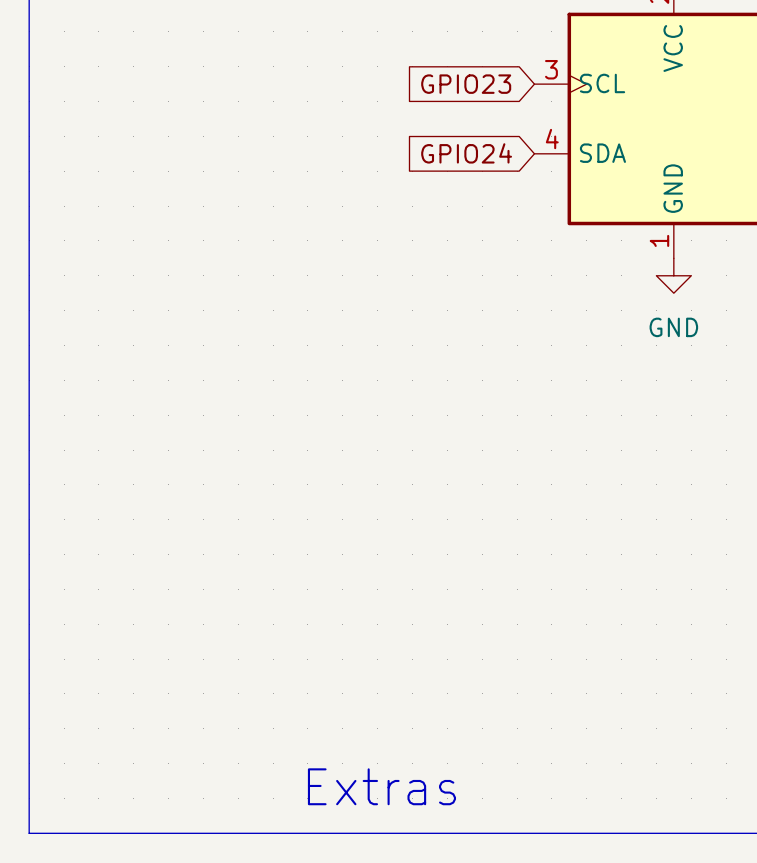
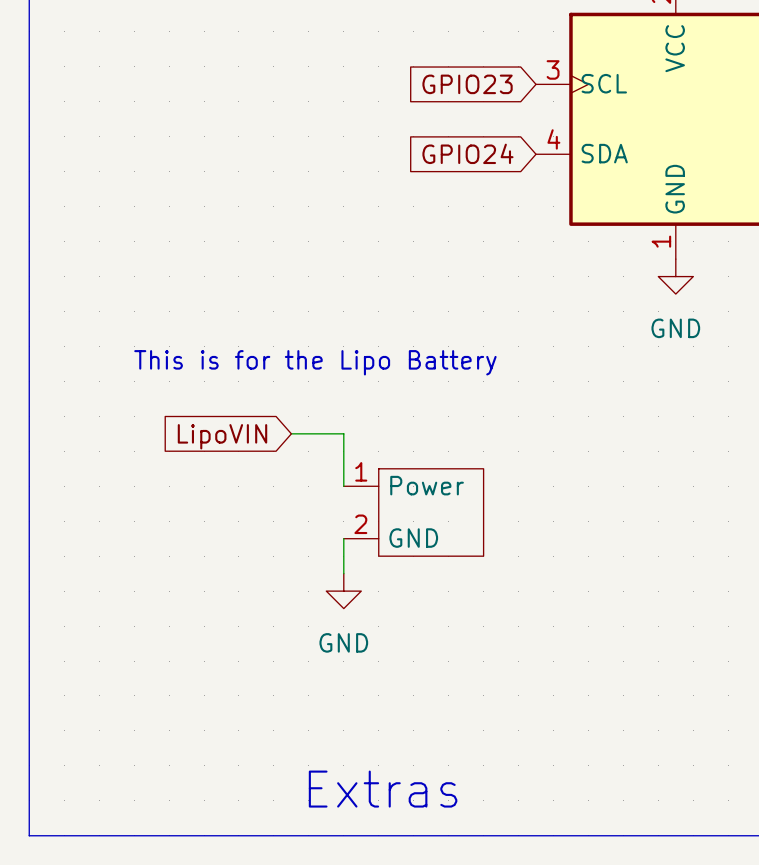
text: none -> This is for the Lipo Battery (315, 362)
wire: none -> (291, 433) (343, 433) (343, 486)
global label: none -> LipoVIN (222, 436)
part: none -> (413, 512)
wire: none -> (343, 538) (343, 573)
power symbol: none -> GND (343, 591)

